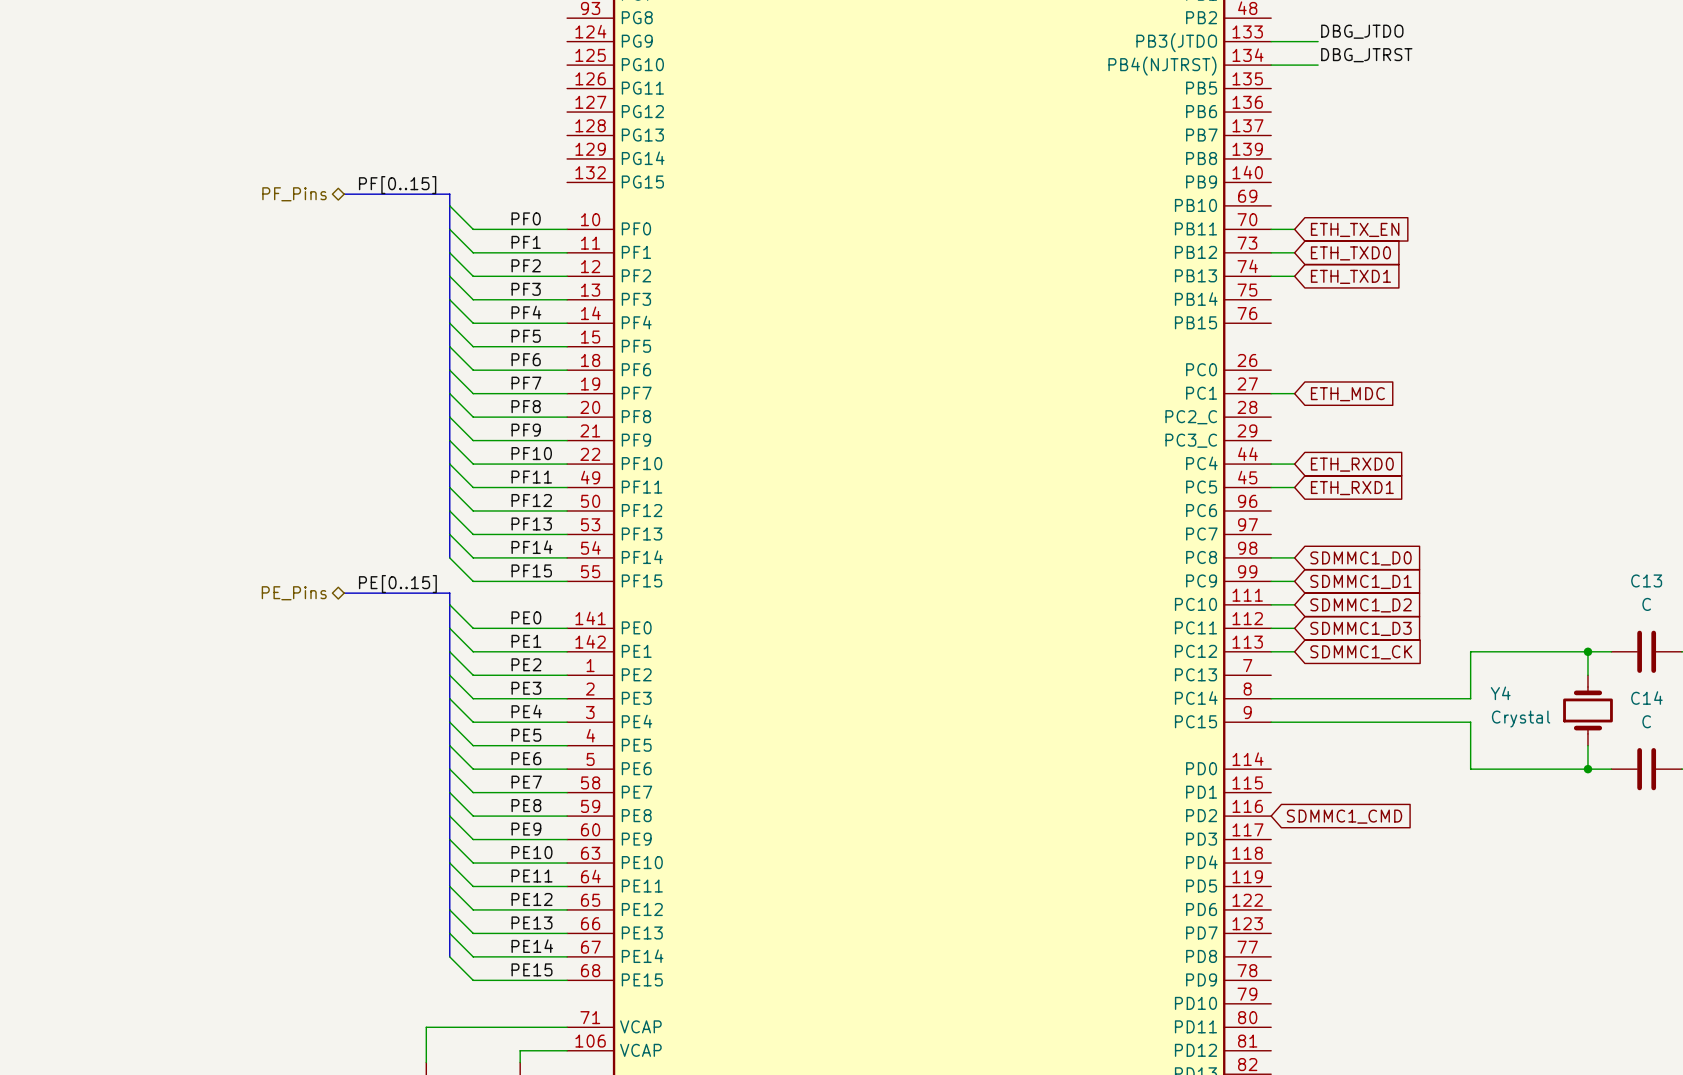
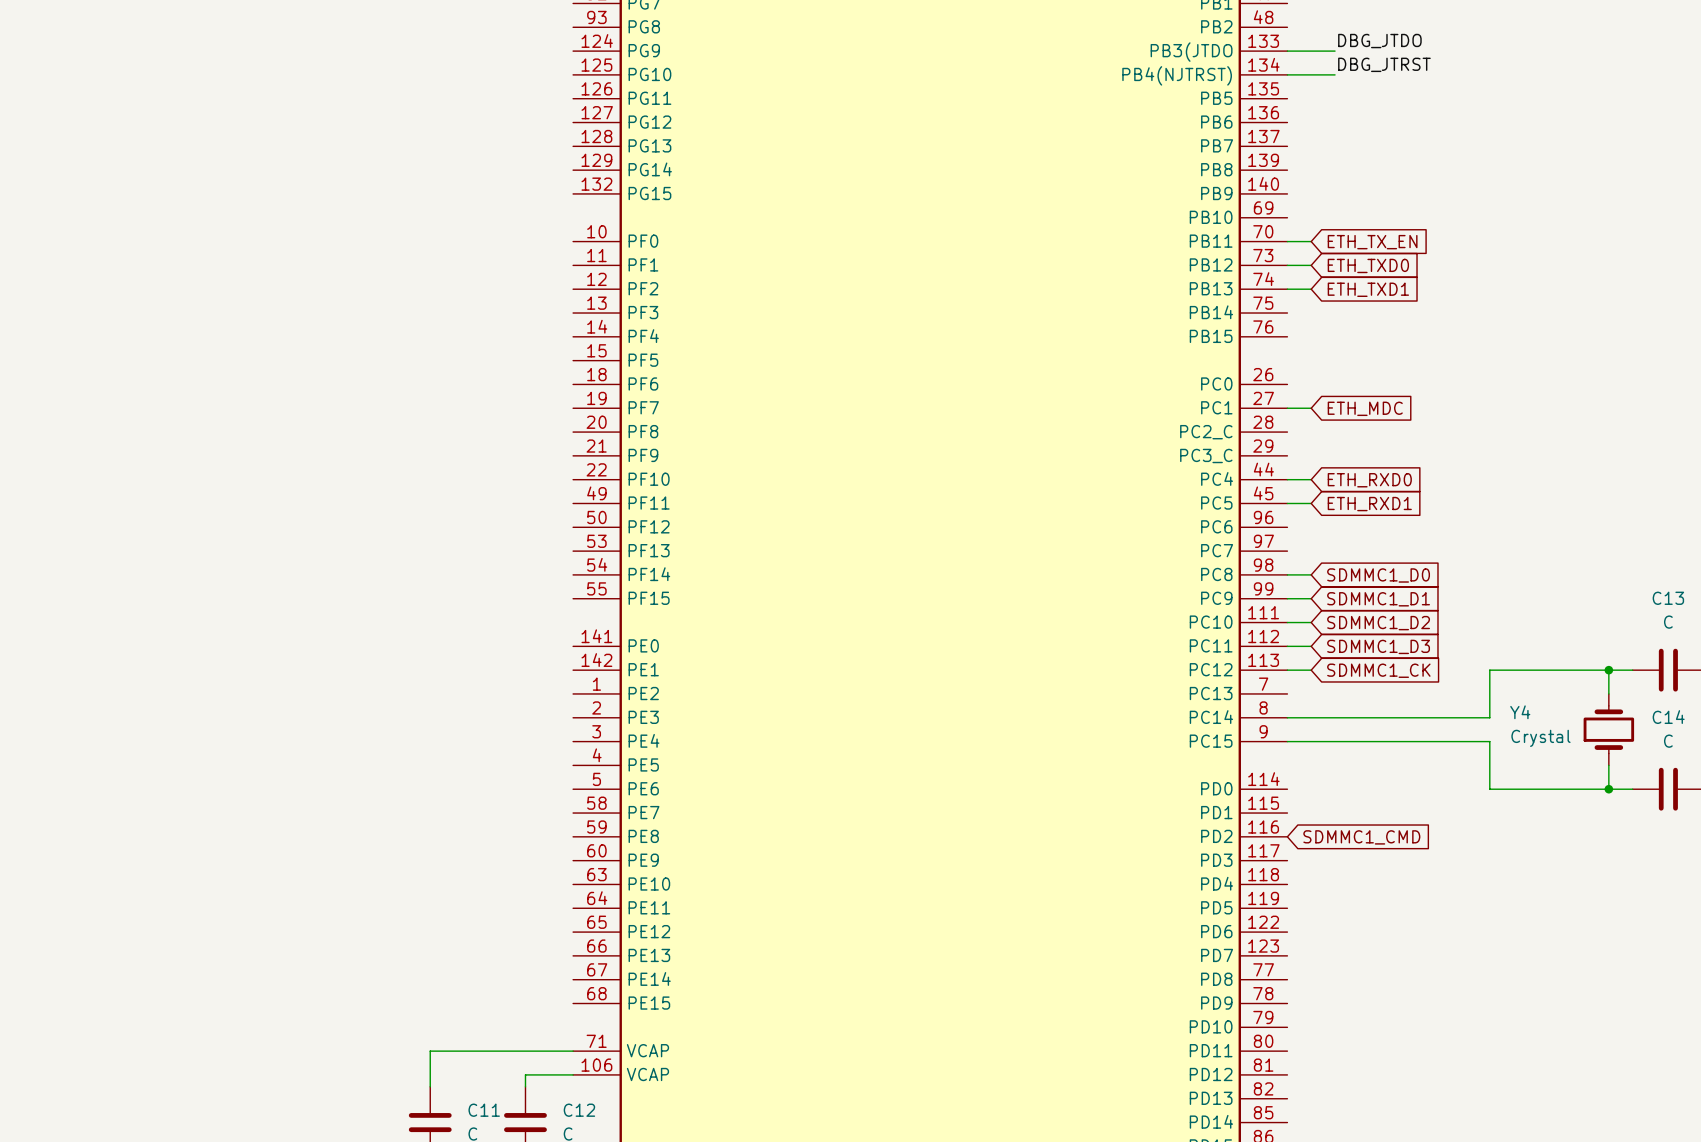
label: PF[0..15] (397, 185) -> none
hierarchical label: PF_Pins (294, 194) -> none
bus: (344, 194) (449, 194) (449, 557) -> none
wire: (449, 205) (473, 229) (567, 229) -> none
label: PF0 (526, 218) -> none
wire: (449, 229) (473, 252) (567, 252) -> none
label: PF1 (526, 242) -> none
wire: (449, 252) (473, 276) (567, 276) -> none
label: PF2 (526, 265) -> none
wire: (449, 276) (473, 299) (567, 299) -> none
label: PF3 (526, 289) -> none
wire: (449, 299) (473, 323) (567, 323) -> none
label: PF4 (526, 312) -> none
wire: (449, 323) (473, 346) (567, 346) -> none
label: PF5 (526, 336) -> none
wire: (449, 346) (473, 370) (567, 370) -> none
label: PF6 (526, 359) -> none
wire: (449, 370) (473, 393) (567, 393) -> none
label: PF7 (526, 383) -> none
wire: (449, 393) (473, 417) (567, 417) -> none
label: PF8 (526, 406) -> none
wire: (449, 417) (473, 440) (567, 440) -> none
label: PF9 (526, 430) -> none
wire: (449, 440) (473, 464) (567, 464) -> none
label: PF10 (531, 453) -> none
wire: (449, 464) (473, 487) (567, 487) -> none
label: PF11 (531, 477) -> none
wire: (449, 487) (473, 510) (567, 510) -> none
label: PF12 (531, 500) -> none
wire: (449, 510) (473, 534) (567, 534) -> none
label: PF13 (531, 523) -> none
wire: (449, 534) (473, 557) (567, 557) -> none
label: PF14 (532, 547) -> none
wire: (449, 557) (473, 581) (567, 581) -> none
label: PF15 (531, 570) -> none
label: PE[0..15] (397, 584) -> none
hierarchical label: PE_Pins (294, 593) -> none
bus: (344, 593) (449, 593) (449, 956) -> none
wire: (449, 604) (473, 628) (567, 628) -> none
label: PE0 (526, 617) -> none
wire: (449, 628) (473, 651) (567, 651) -> none
label: PE1 (526, 641) -> none
wire: (449, 651) (473, 675) (567, 675) -> none
label: PE2 (526, 664) -> none
wire: (449, 675) (473, 698) (567, 698) -> none
label: PE3 (526, 688) -> none
wire: (449, 698) (473, 722) (567, 722) -> none
label: PE4 (526, 711) -> none
wire: (449, 722) (473, 745) (567, 745) -> none
label: PE5 (526, 735) -> none
wire: (449, 745) (473, 769) (567, 769) -> none
label: PE6 (526, 758) -> none
wire: (449, 769) (473, 792) (567, 792) -> none
label: PE7 (526, 782) -> none
wire: (449, 792) (473, 816) (567, 816) -> none
label: PE8 (526, 805) -> none
wire: (449, 816) (473, 839) (567, 839) -> none
label: PE9 (526, 829) -> none
wire: (449, 839) (473, 863) (567, 863) -> none
label: PE10 (532, 852) -> none
wire: (449, 863) (473, 886) (567, 886) -> none
label: PE11 (532, 876) -> none
wire: (449, 886) (473, 909) (567, 909) -> none
label: PE12 (532, 899) -> none
wire: (449, 909) (473, 933) (567, 933) -> none
label: PE13 (532, 922) -> none
wire: (449, 933) (473, 956) (567, 956) -> none
label: PE14 (532, 946) -> none
wire: (449, 956) (473, 980) (567, 980) -> none
label: PE15 (532, 969) -> none

